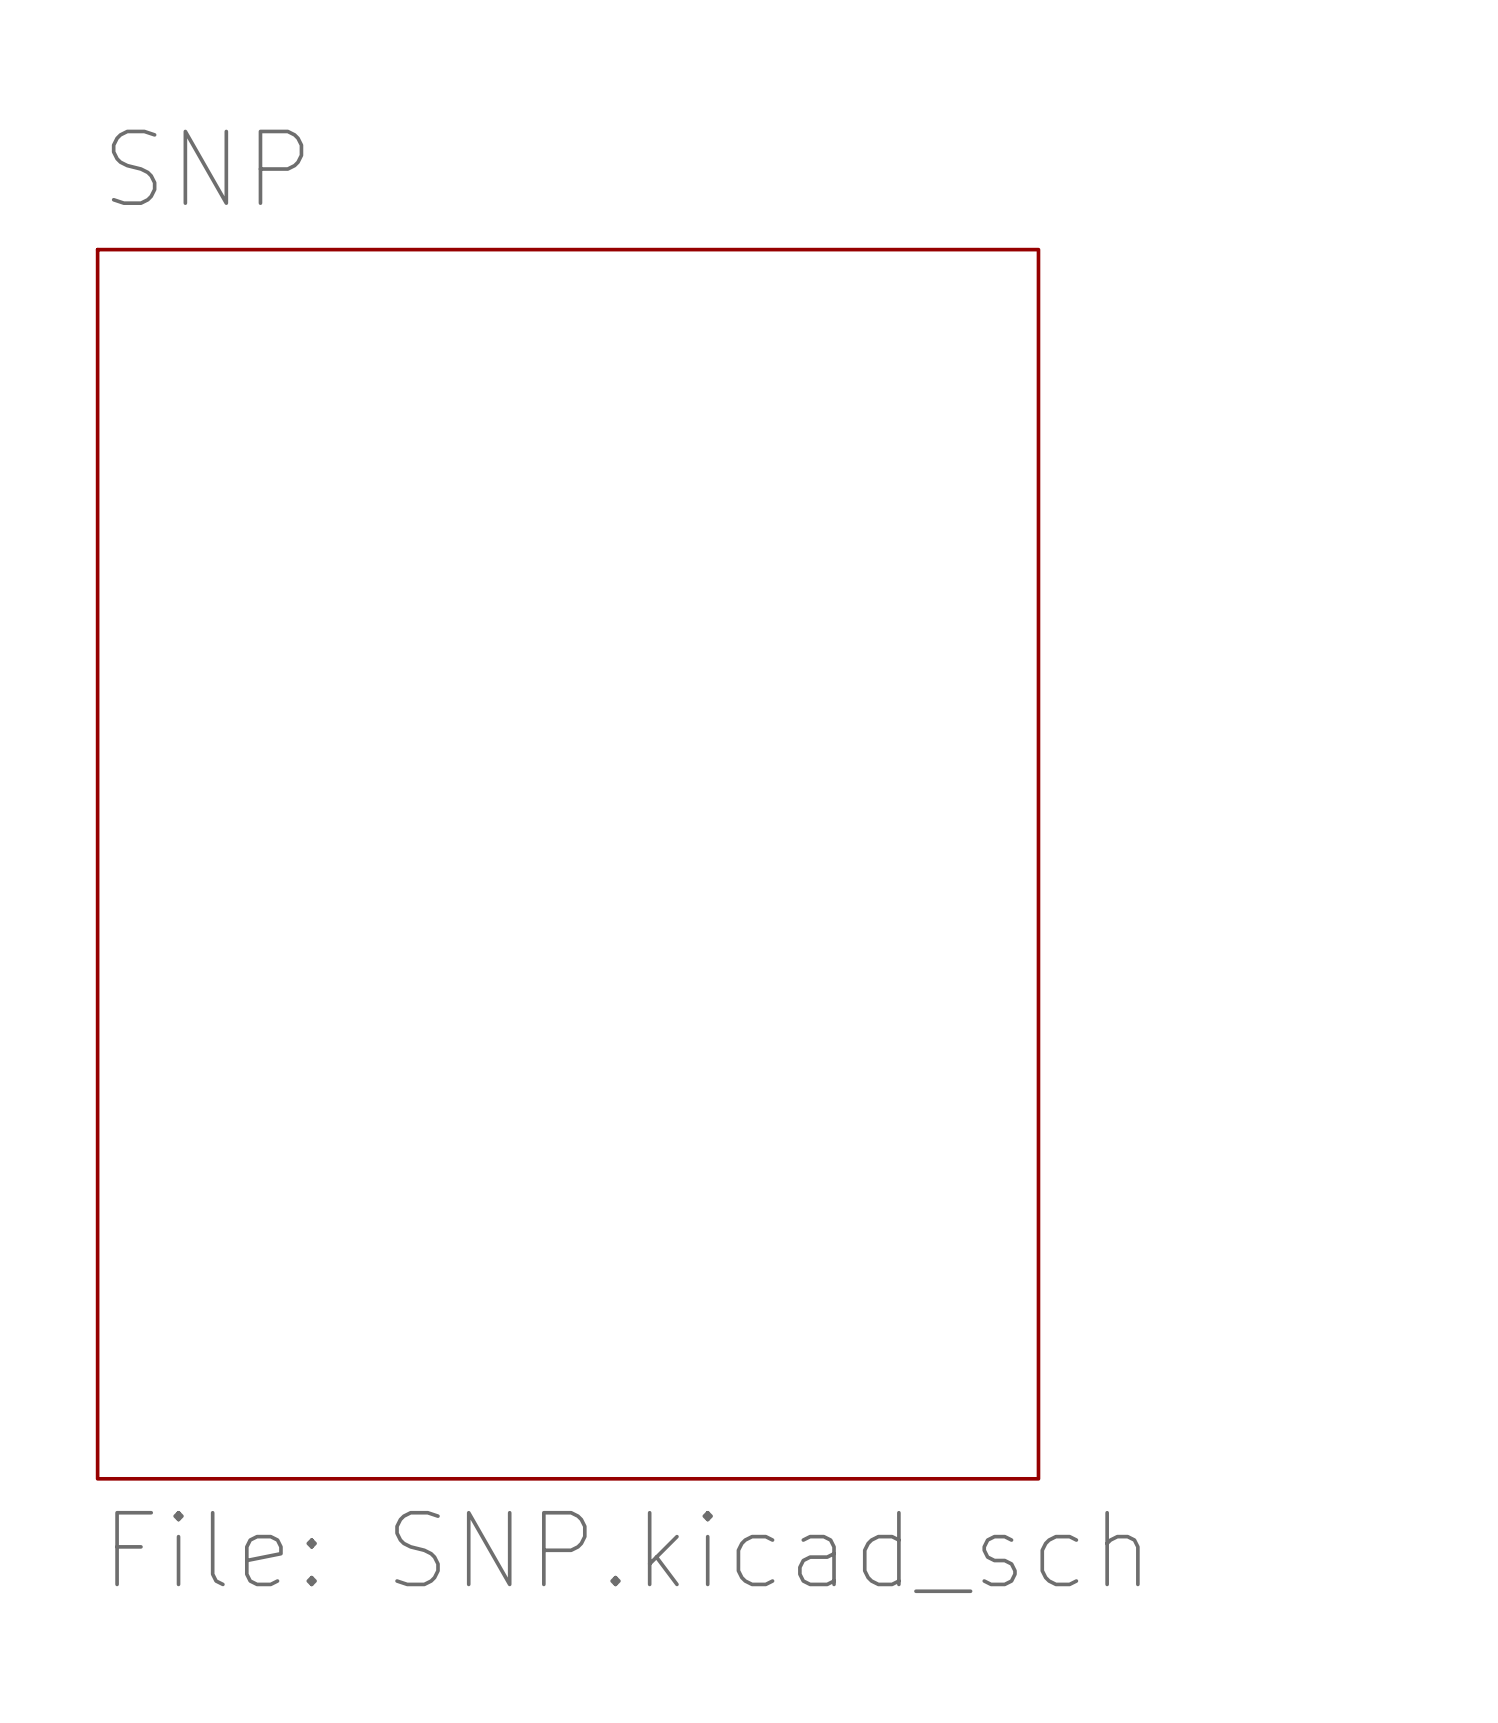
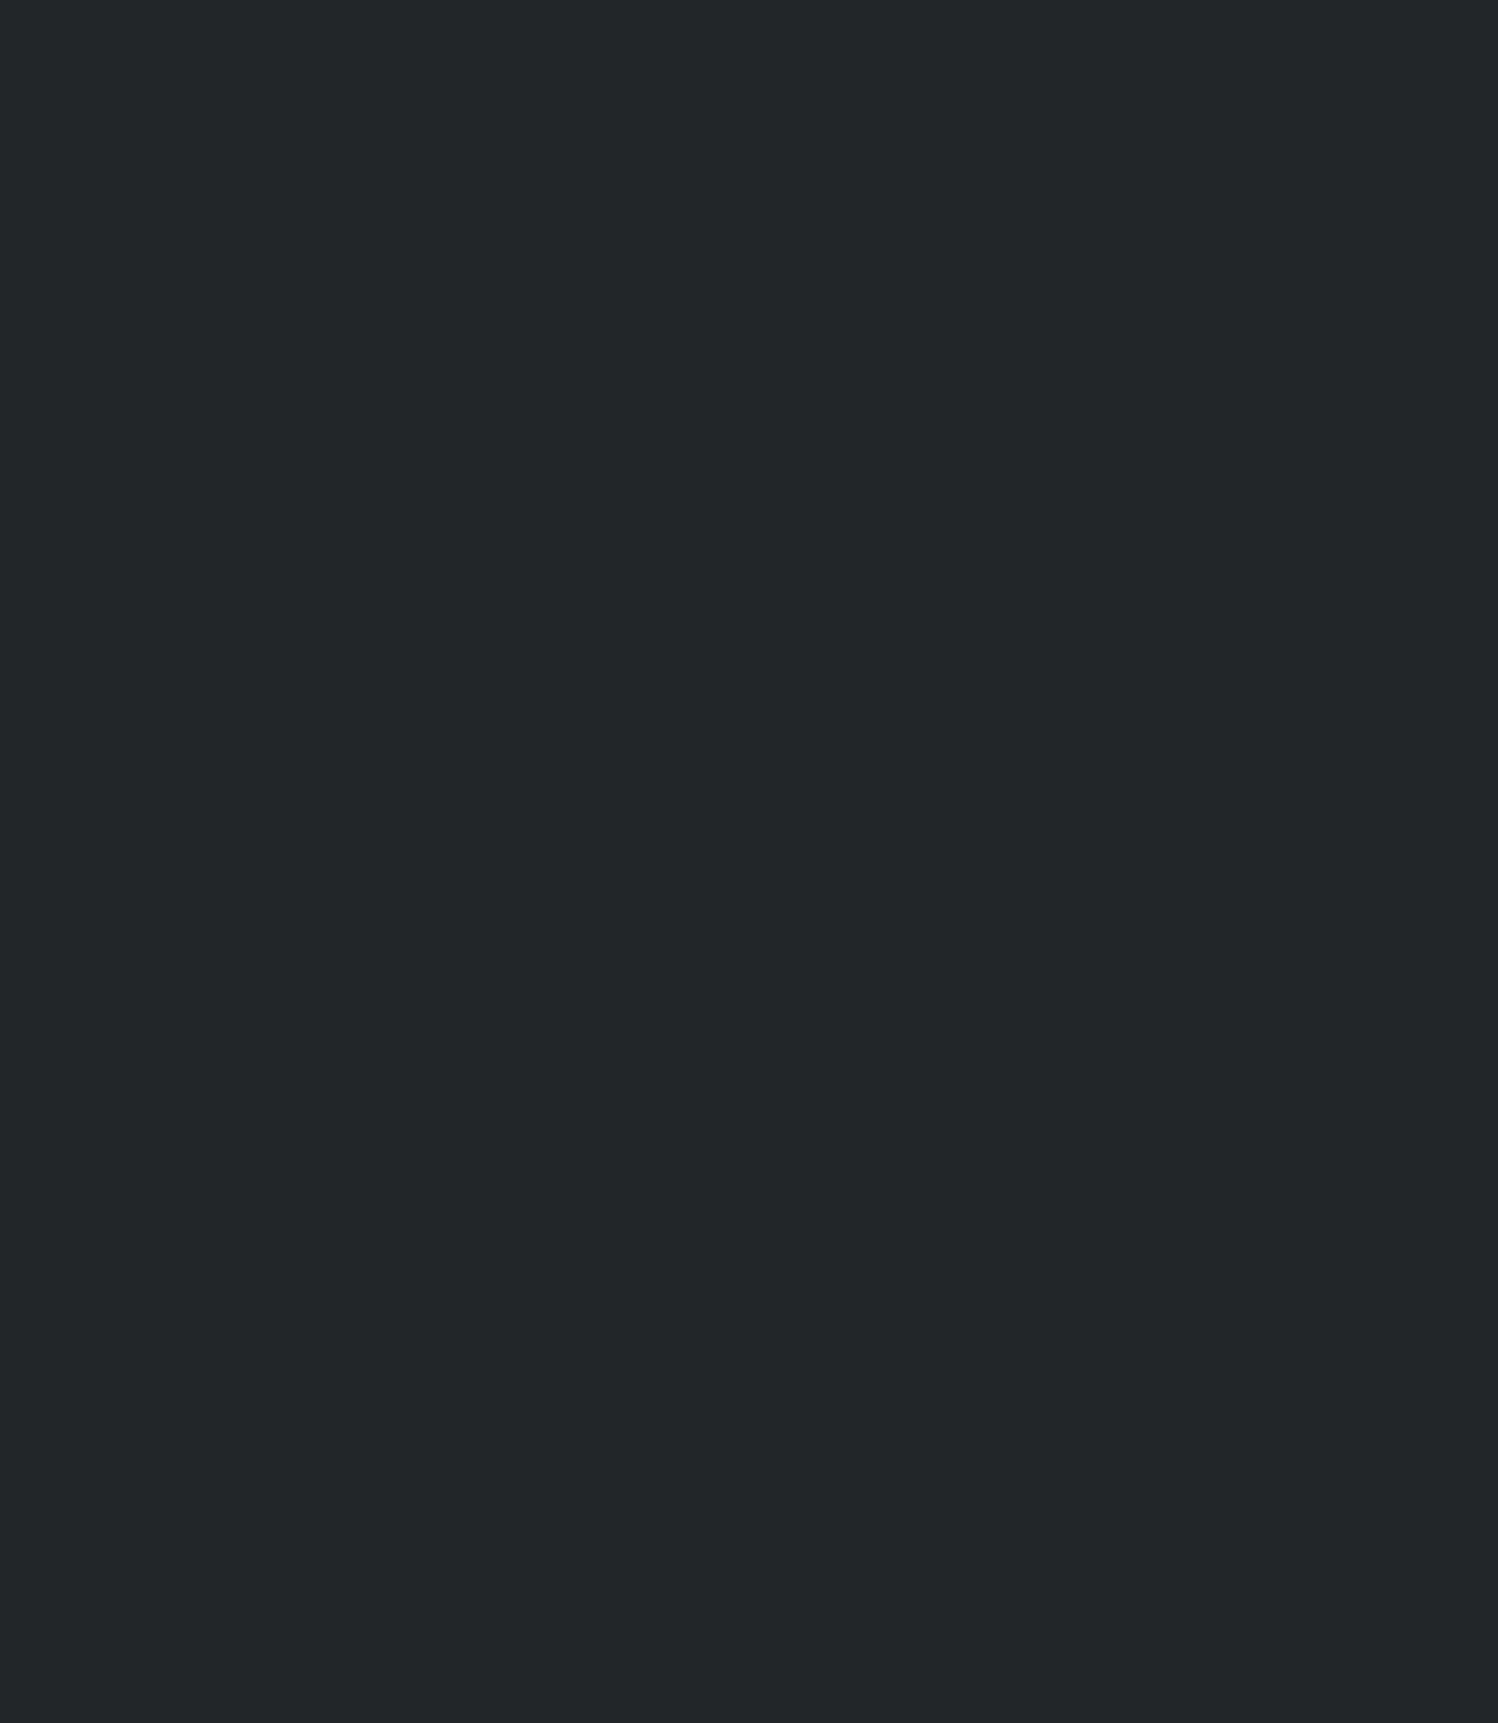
sheet SNP: File: SNP.kicad_sch (568, 864) -> none

